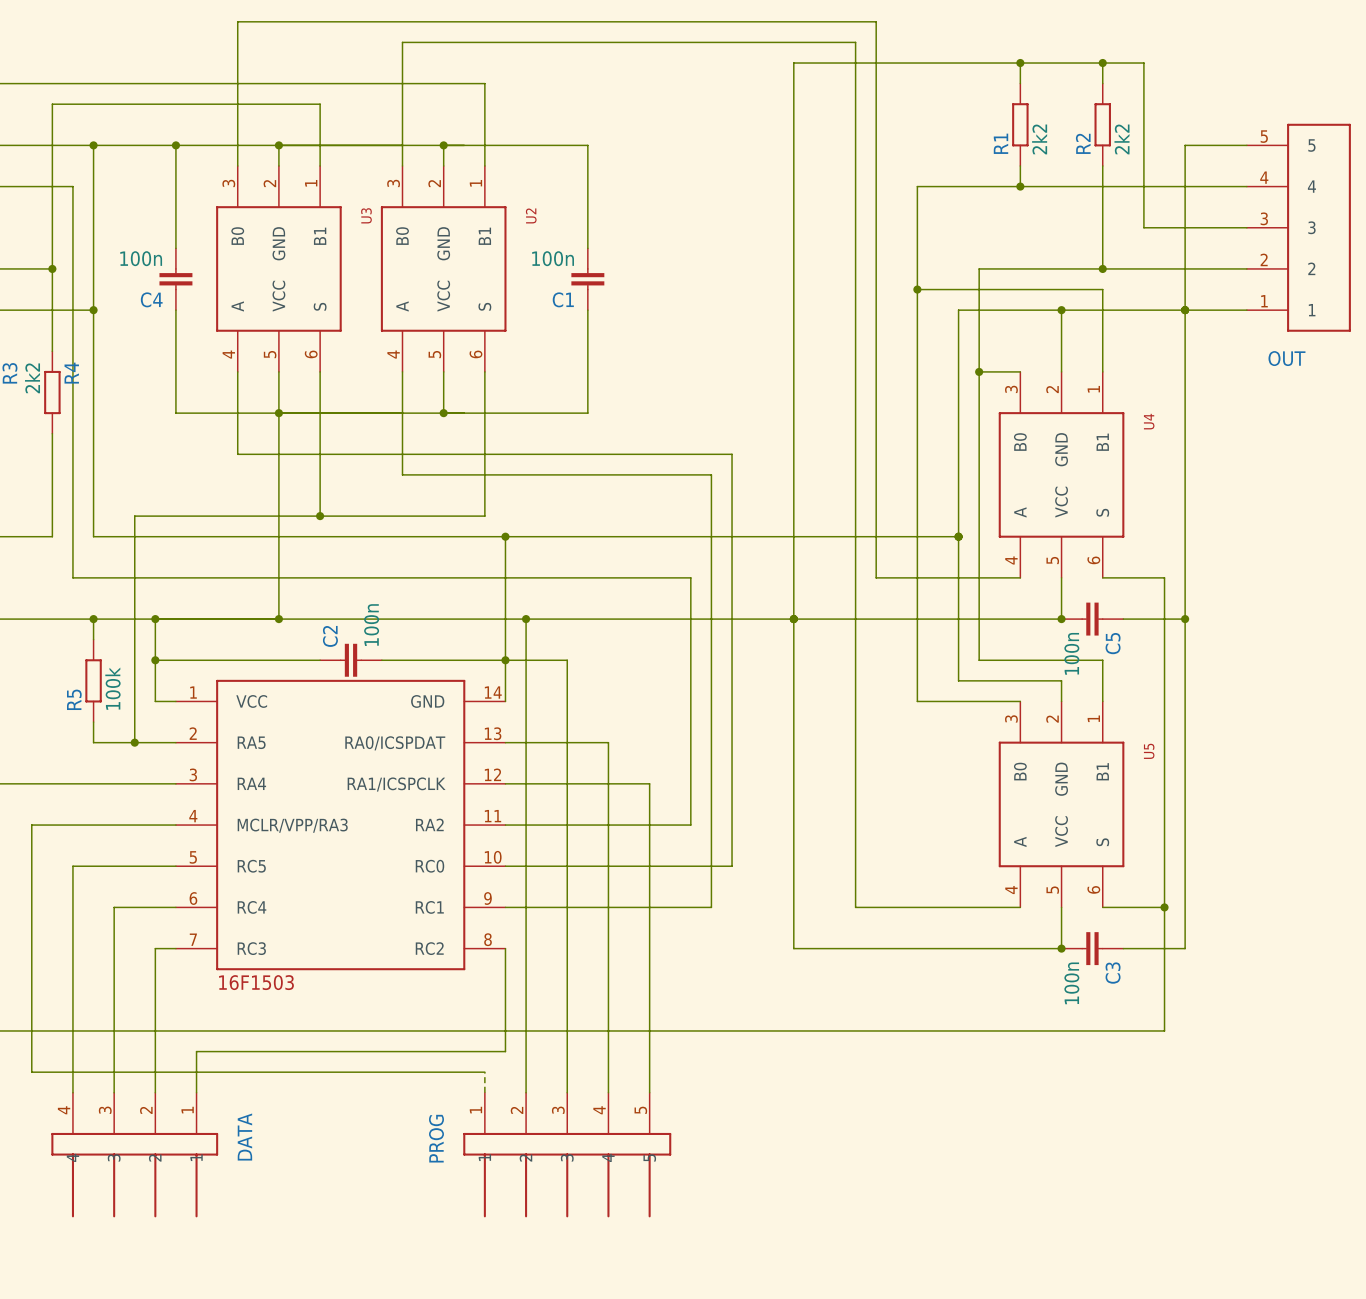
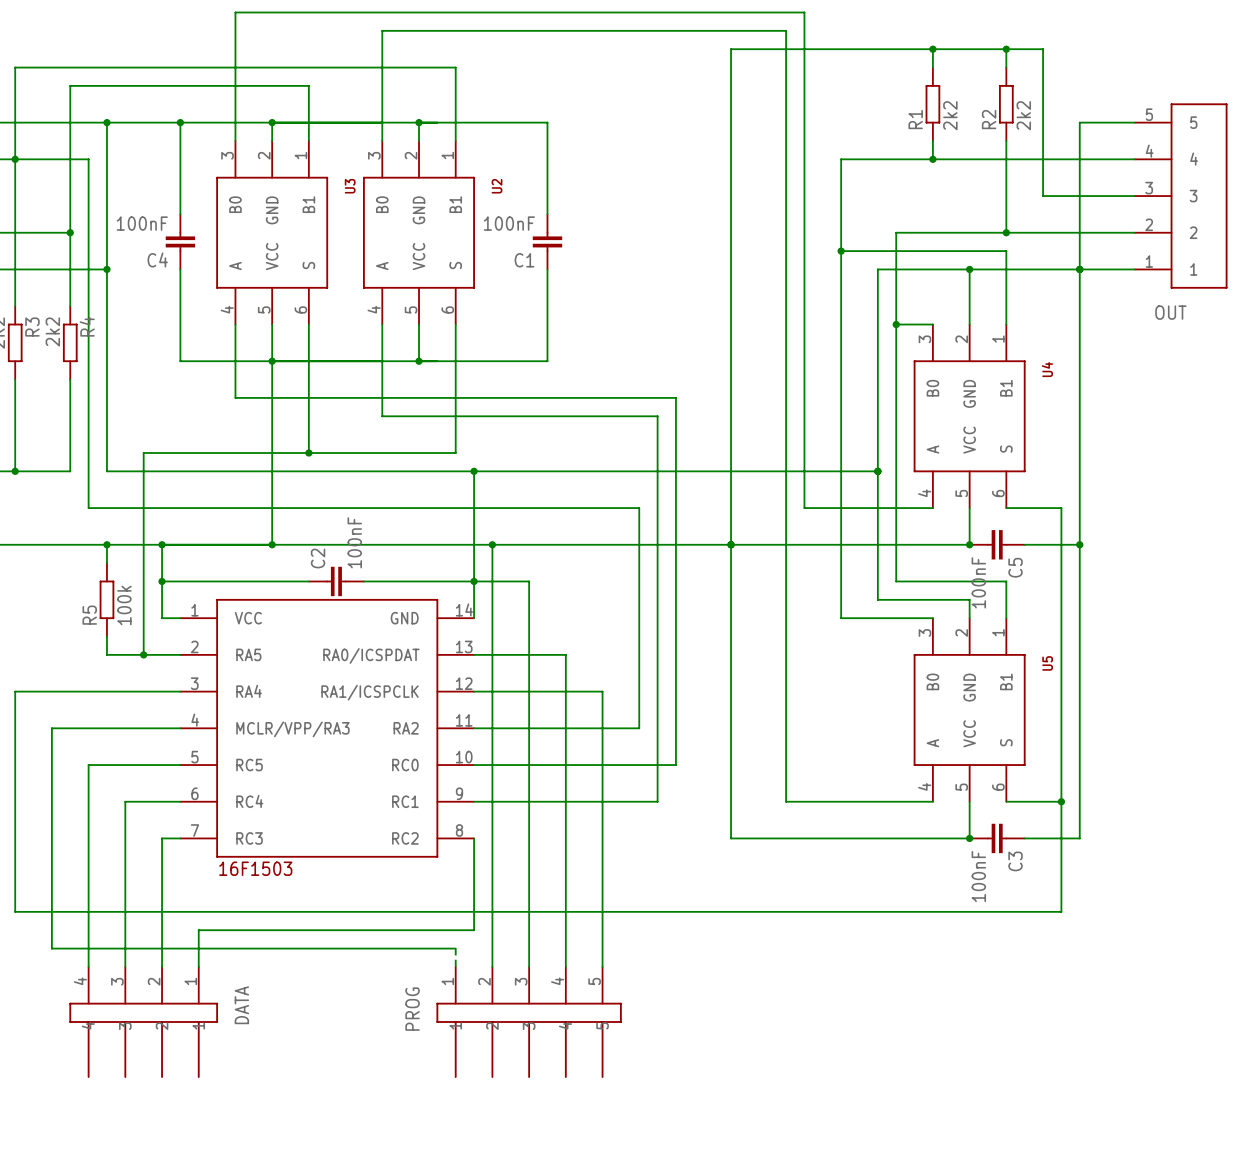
C4 value: 100n (141, 258) -> 100nF (142, 223)
C1 value: 100n (553, 258) -> 100nF (509, 223)
C2 value: 100n (371, 625) -> 100nF (354, 542)
C5 value: 100n (1071, 653) -> 100nF (978, 582)
C3 value: 100n (1071, 983) -> 100nF (978, 876)

